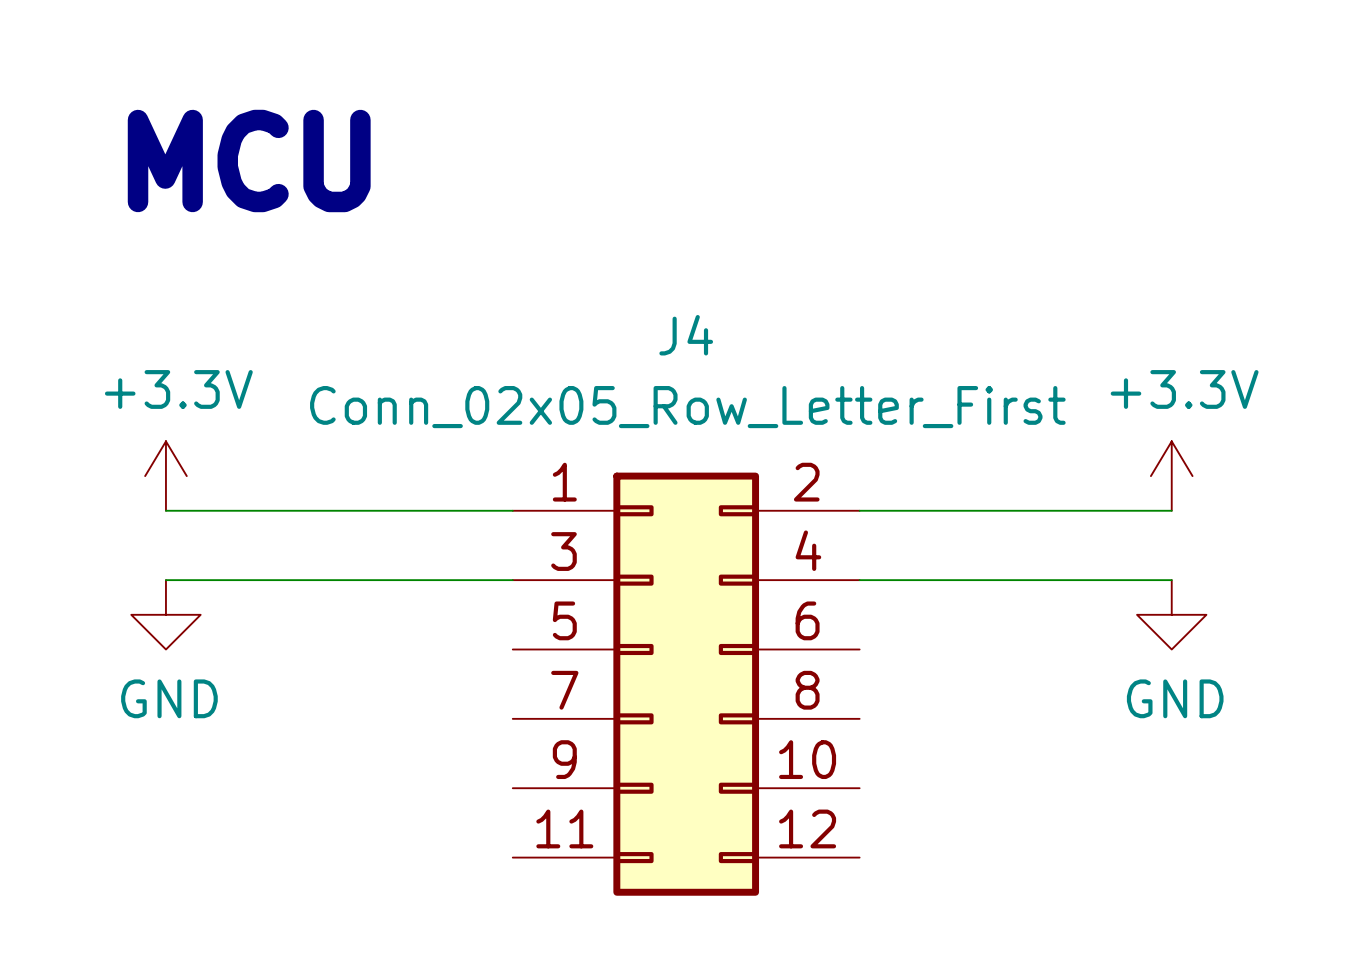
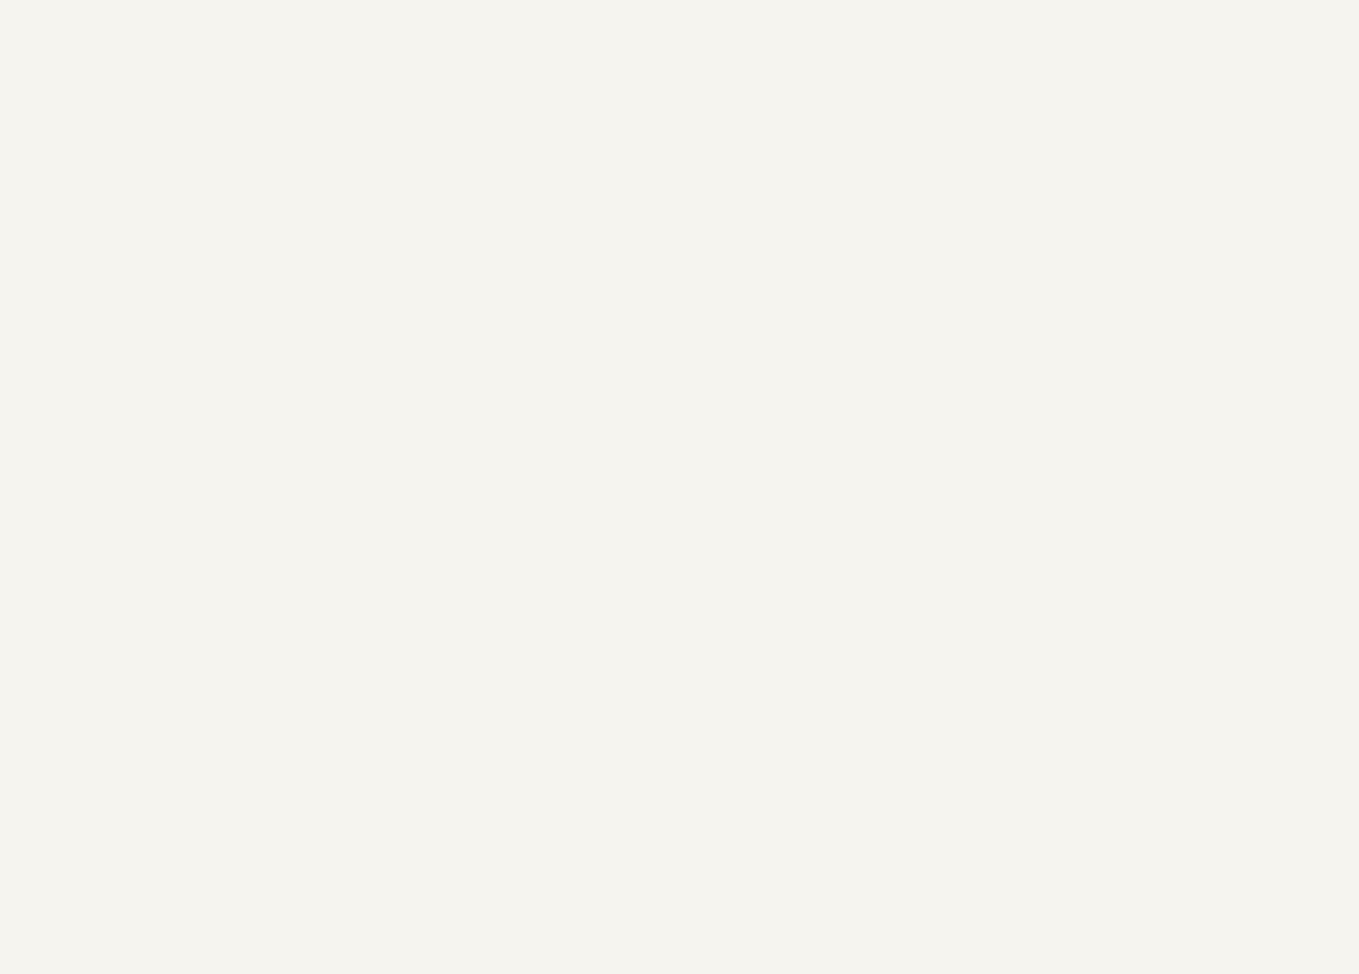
text: MCU (249, 161) -> none
power symbol: +3.3V (165, 476) -> none
power symbol: +3.3V (1171, 476) -> none
wire: (165, 510) (512, 510) -> none
wire: (859, 510) (1171, 510) -> none
wire: (165, 580) (512, 580) -> none
wire: (859, 580) (1171, 580) -> none
power symbol: GND (165, 614) -> none
power symbol: GND (1171, 614) -> none
J4: Conn_02x05_Row_Letter_First (686, 684) -> none

